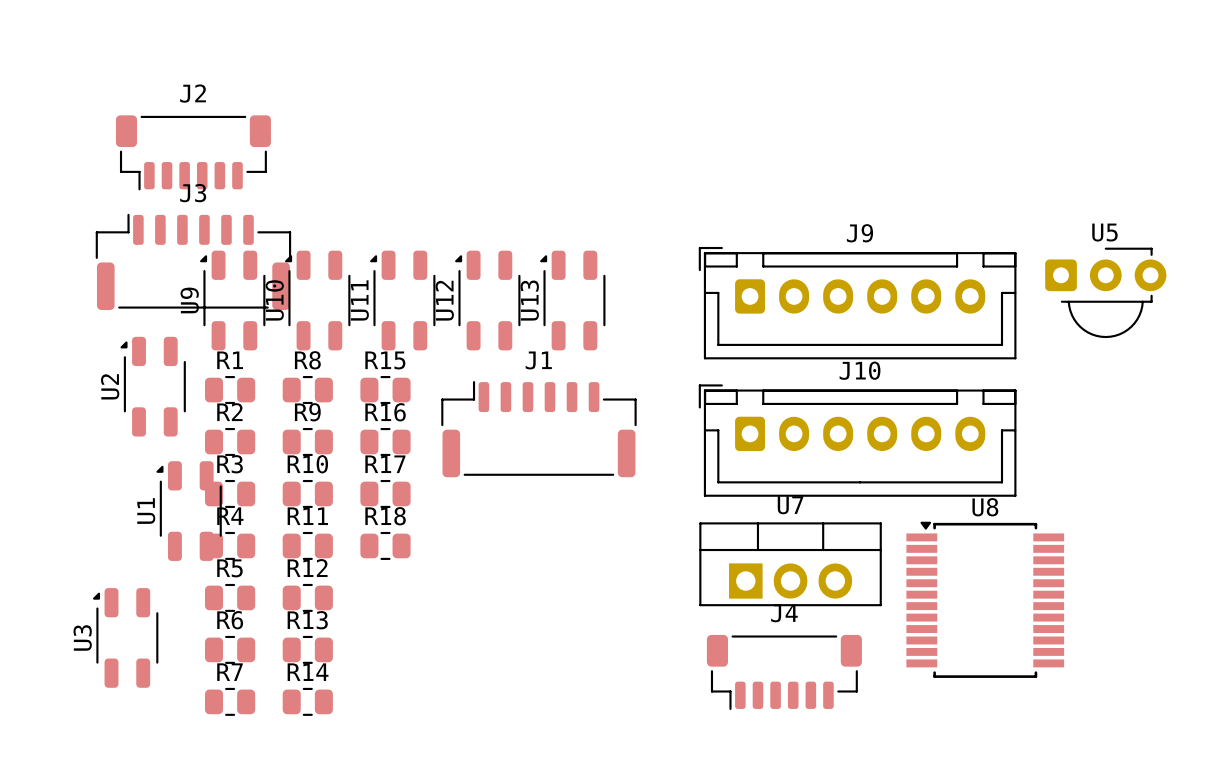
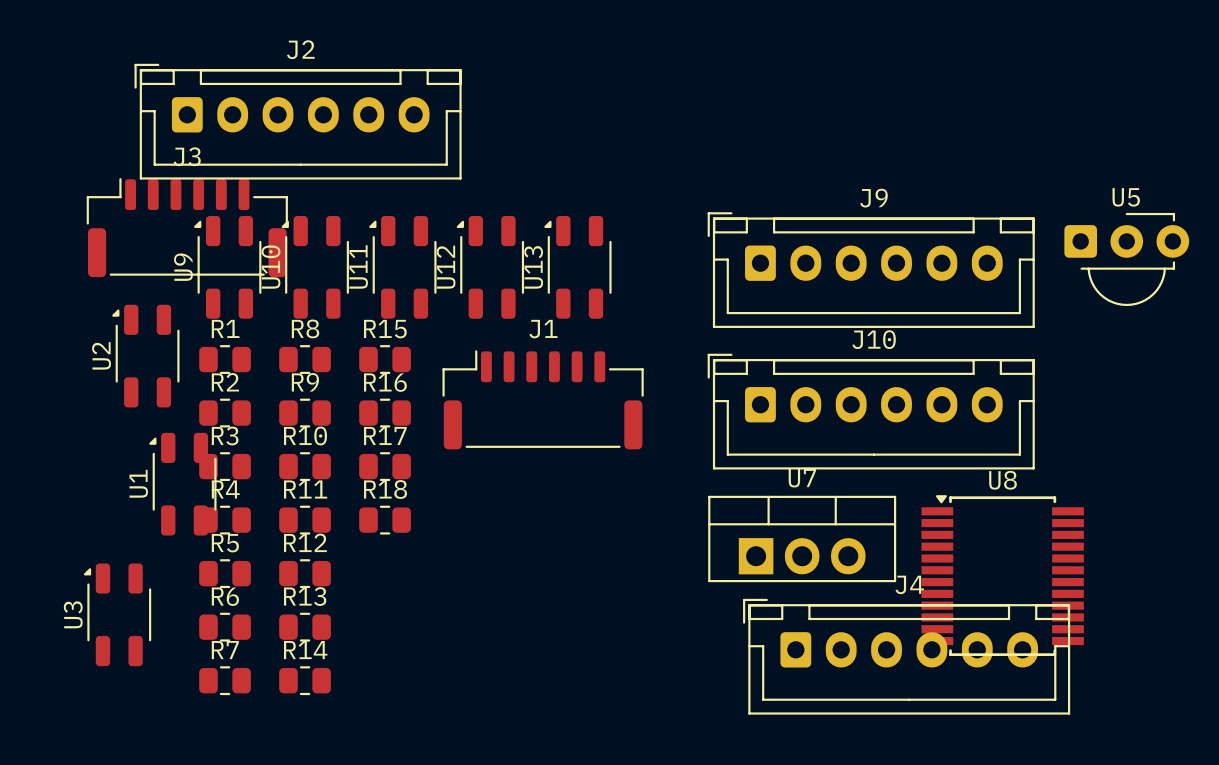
J2 footprint: [115, 115, 271, 191] -> [134, 63, 462, 180]
J4 footprint: [706, 634, 862, 710] -> [743, 598, 1071, 715]

